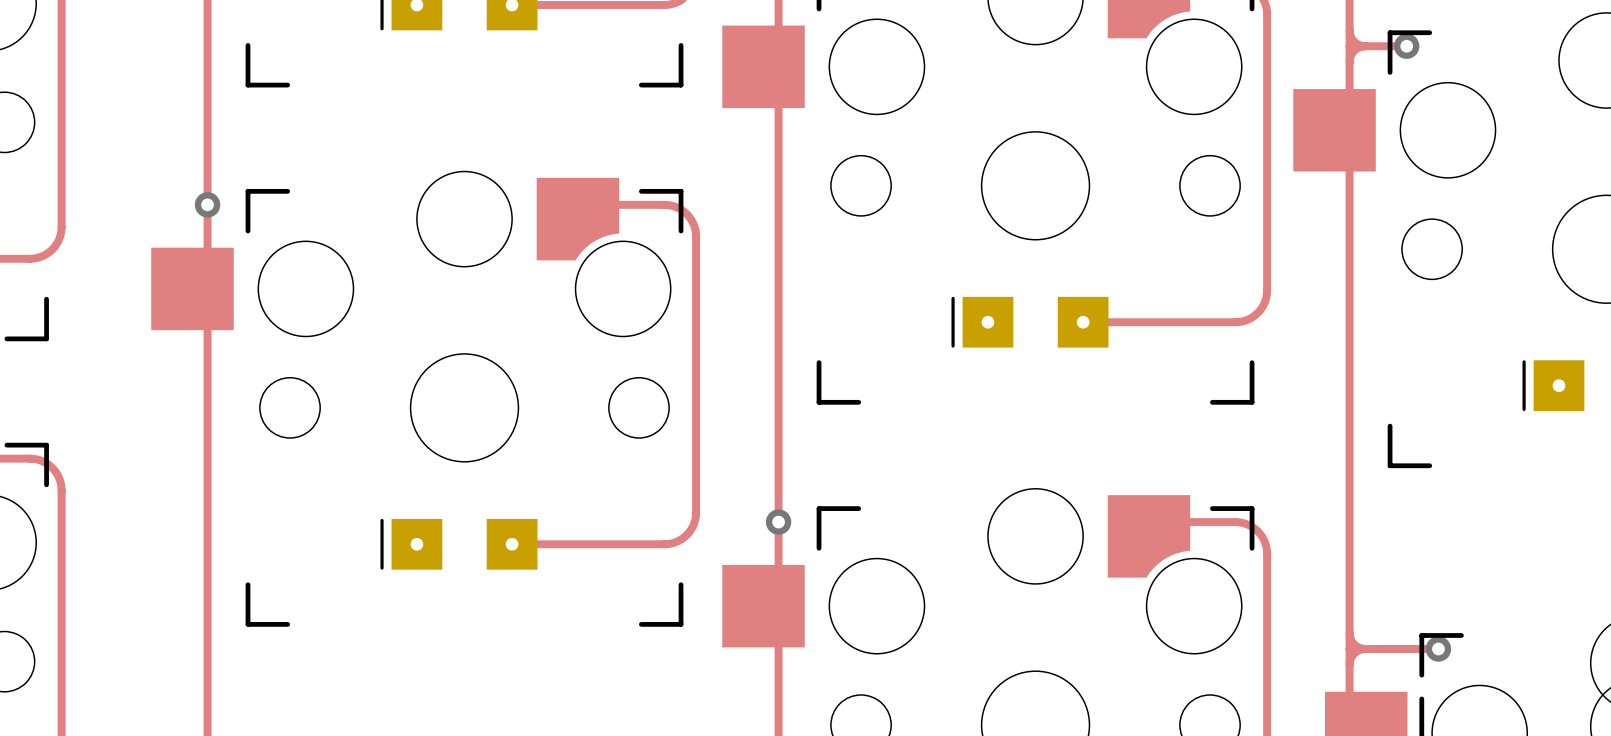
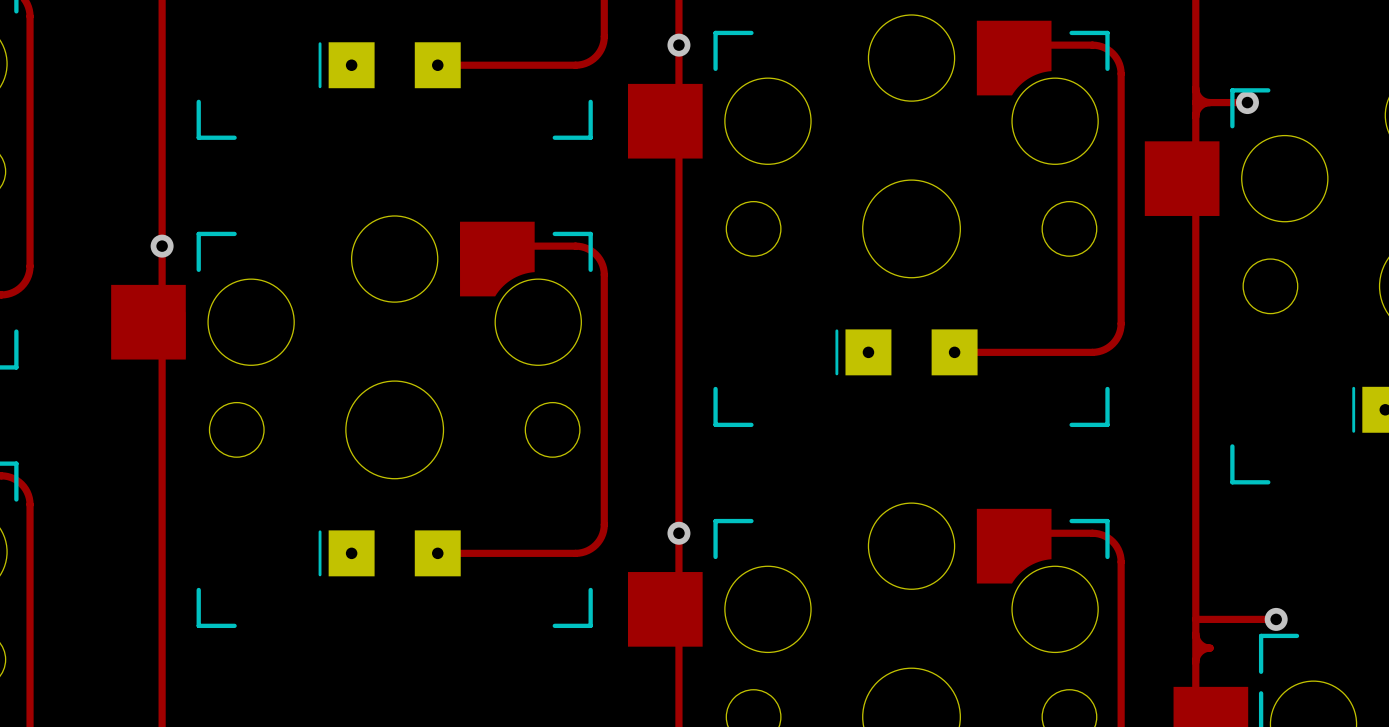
track: (1349, 648) (1438, 648) -> (1195, 619) (1276, 619)
via position: (1438, 648) -> (1276, 619)

